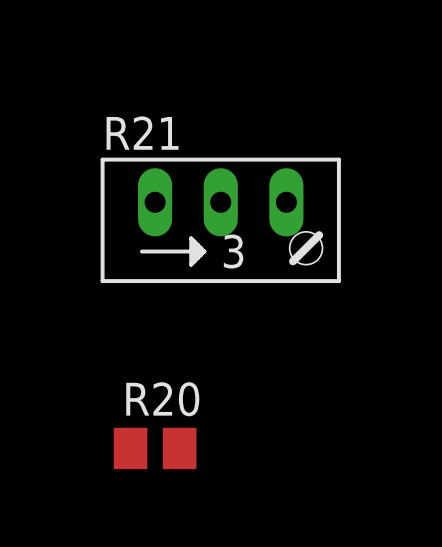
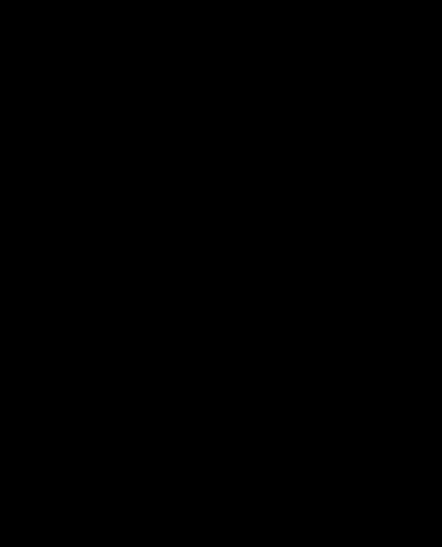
R21: (220, 220) -> none
R20: (155, 448) -> none

